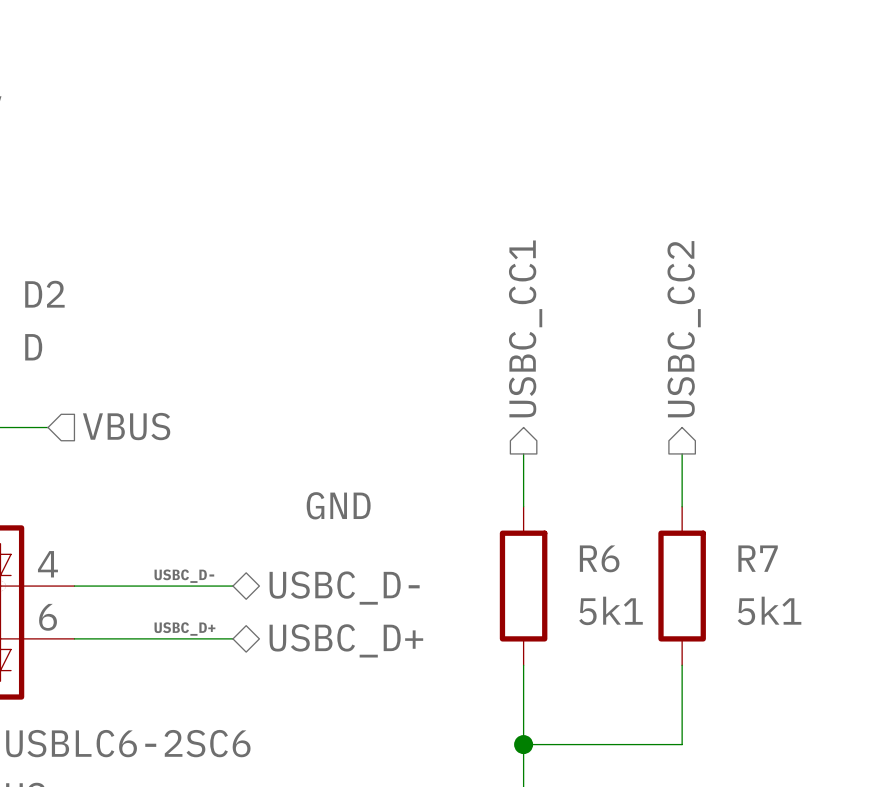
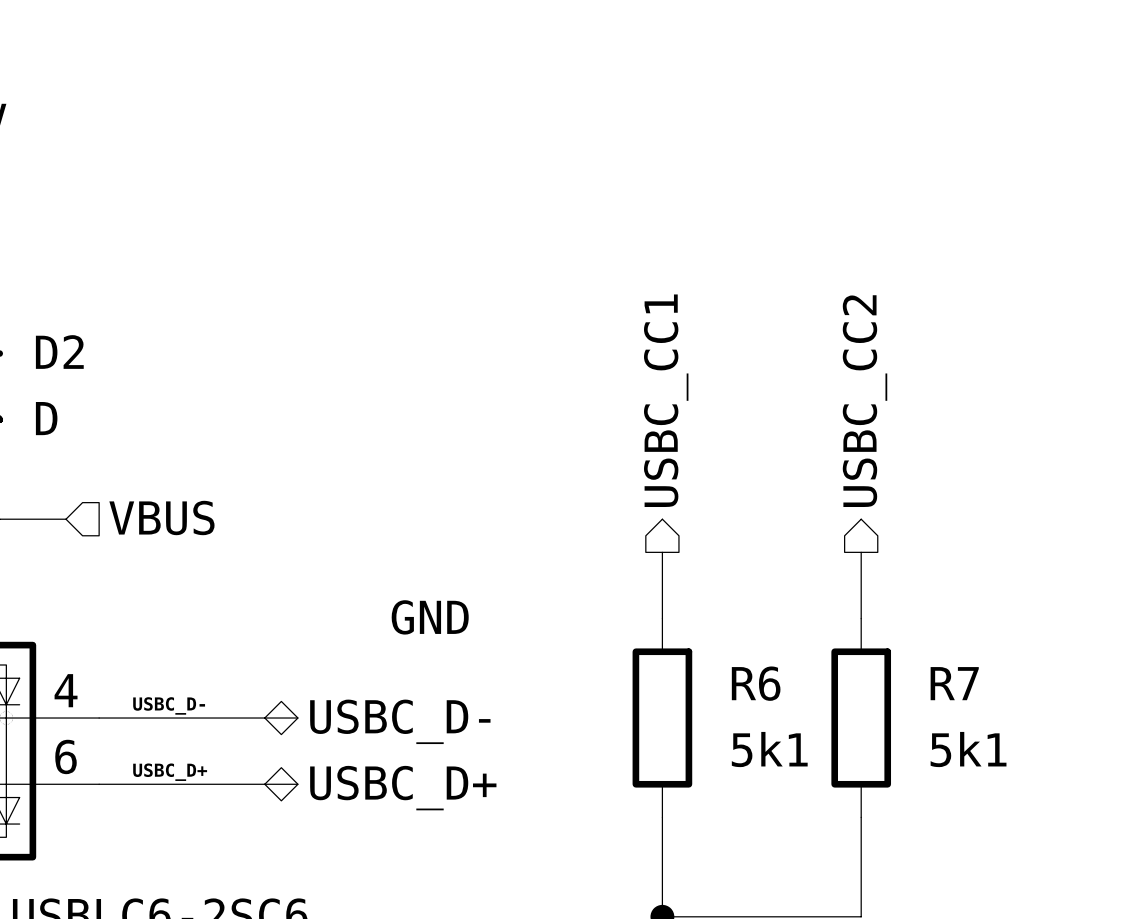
label position: USBC_D- (184, 576) -> USBC_D- (169, 705)
hierarchical label position: USBC_D- (344, 588) -> USBC_D- (400, 721)
label position: USBC_D+ (184, 629) -> USBC_D+ (170, 772)
hierarchical label position: USBC_D+ (346, 640) -> USBC_D+ (403, 788)

